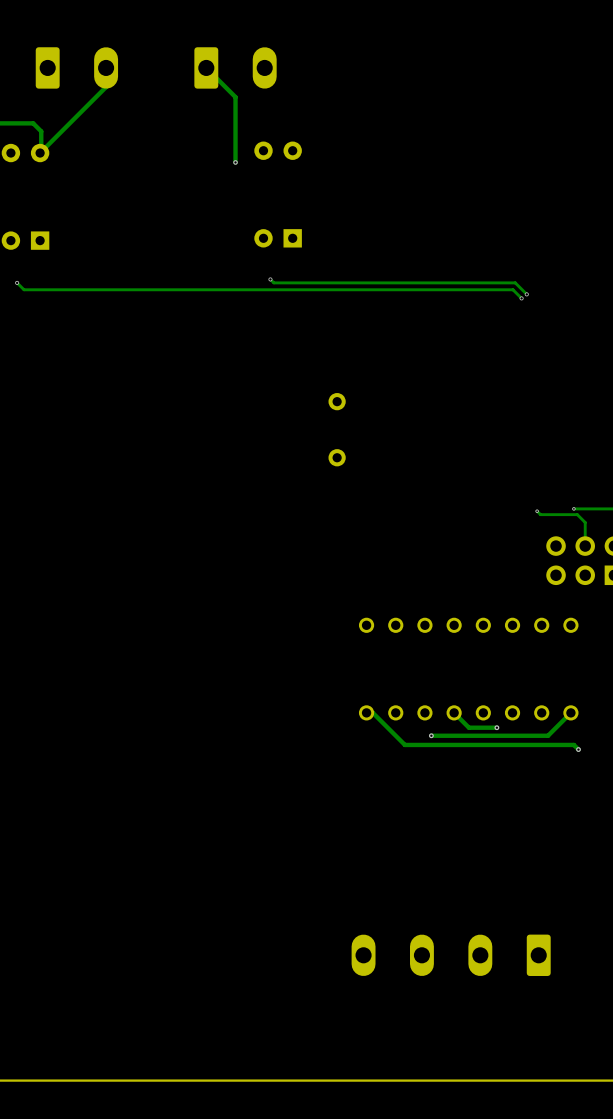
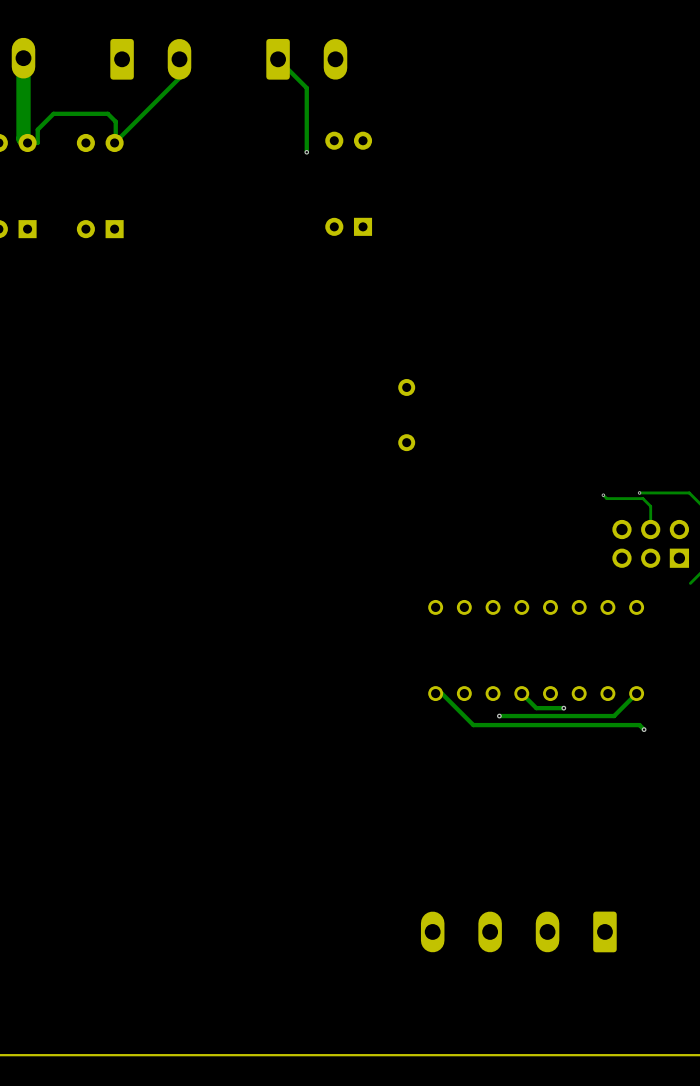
track: (270, 279) (273, 282) (515, 282) (526, 294) -> none
via: (270, 279) -> none
track: (17, 282) (24, 289) (512, 289) (521, 298) -> none
via: (17, 282) -> none
via: (526, 294) -> none
via: (521, 298) -> none

